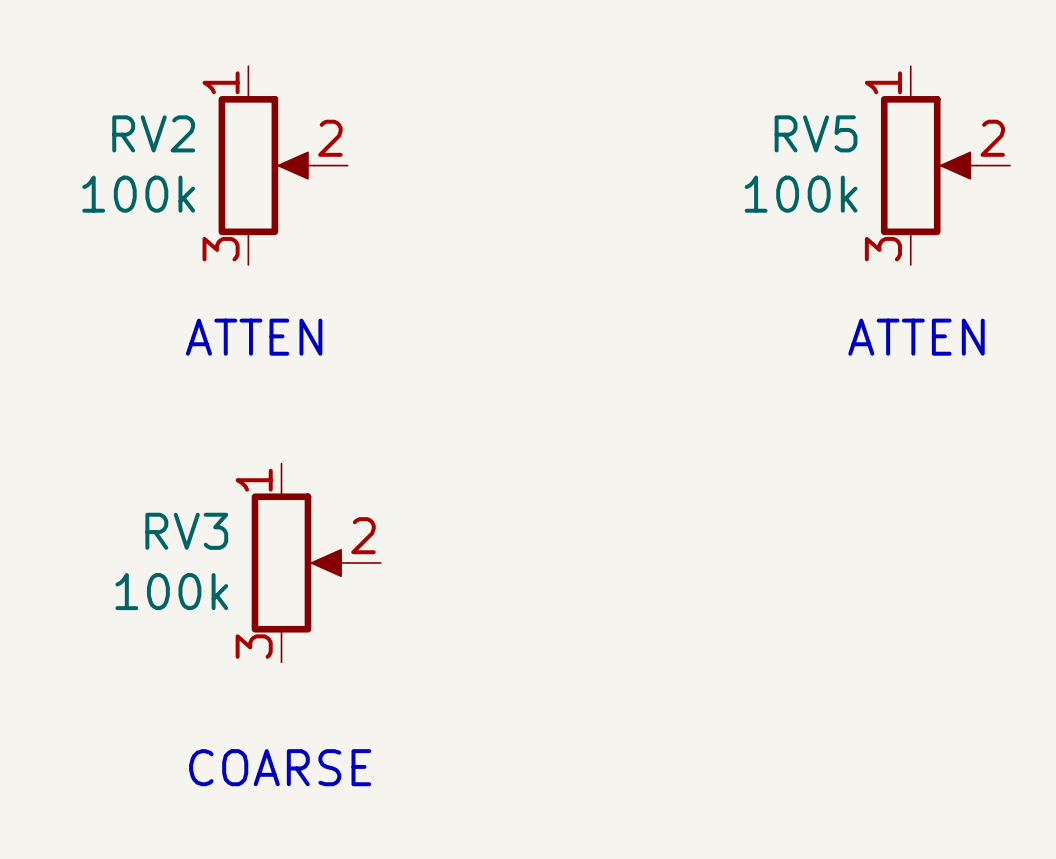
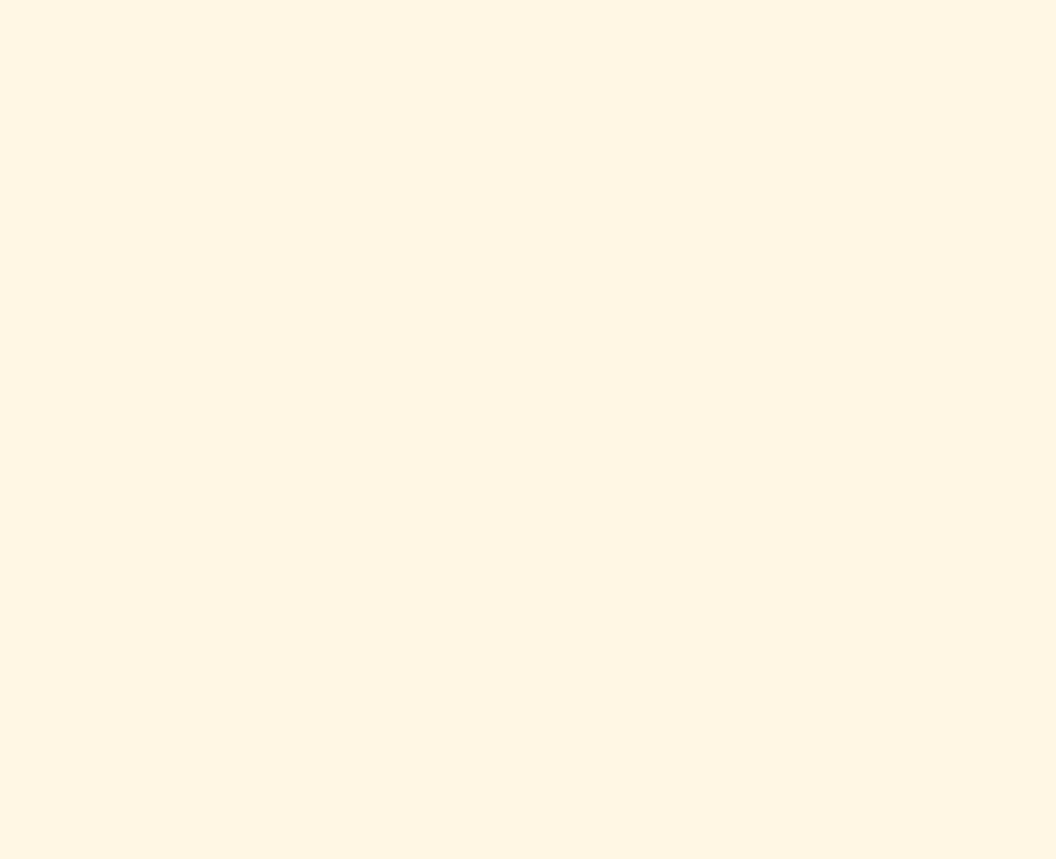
RV2: 100k (283, 165) -> none
RV5: 100k (945, 165) -> none
text: ATTEN (254, 337) -> none
text: ATTEN (916, 337) -> none
RV3: 100k (316, 562) -> none
text: COARSE (280, 767) -> none

